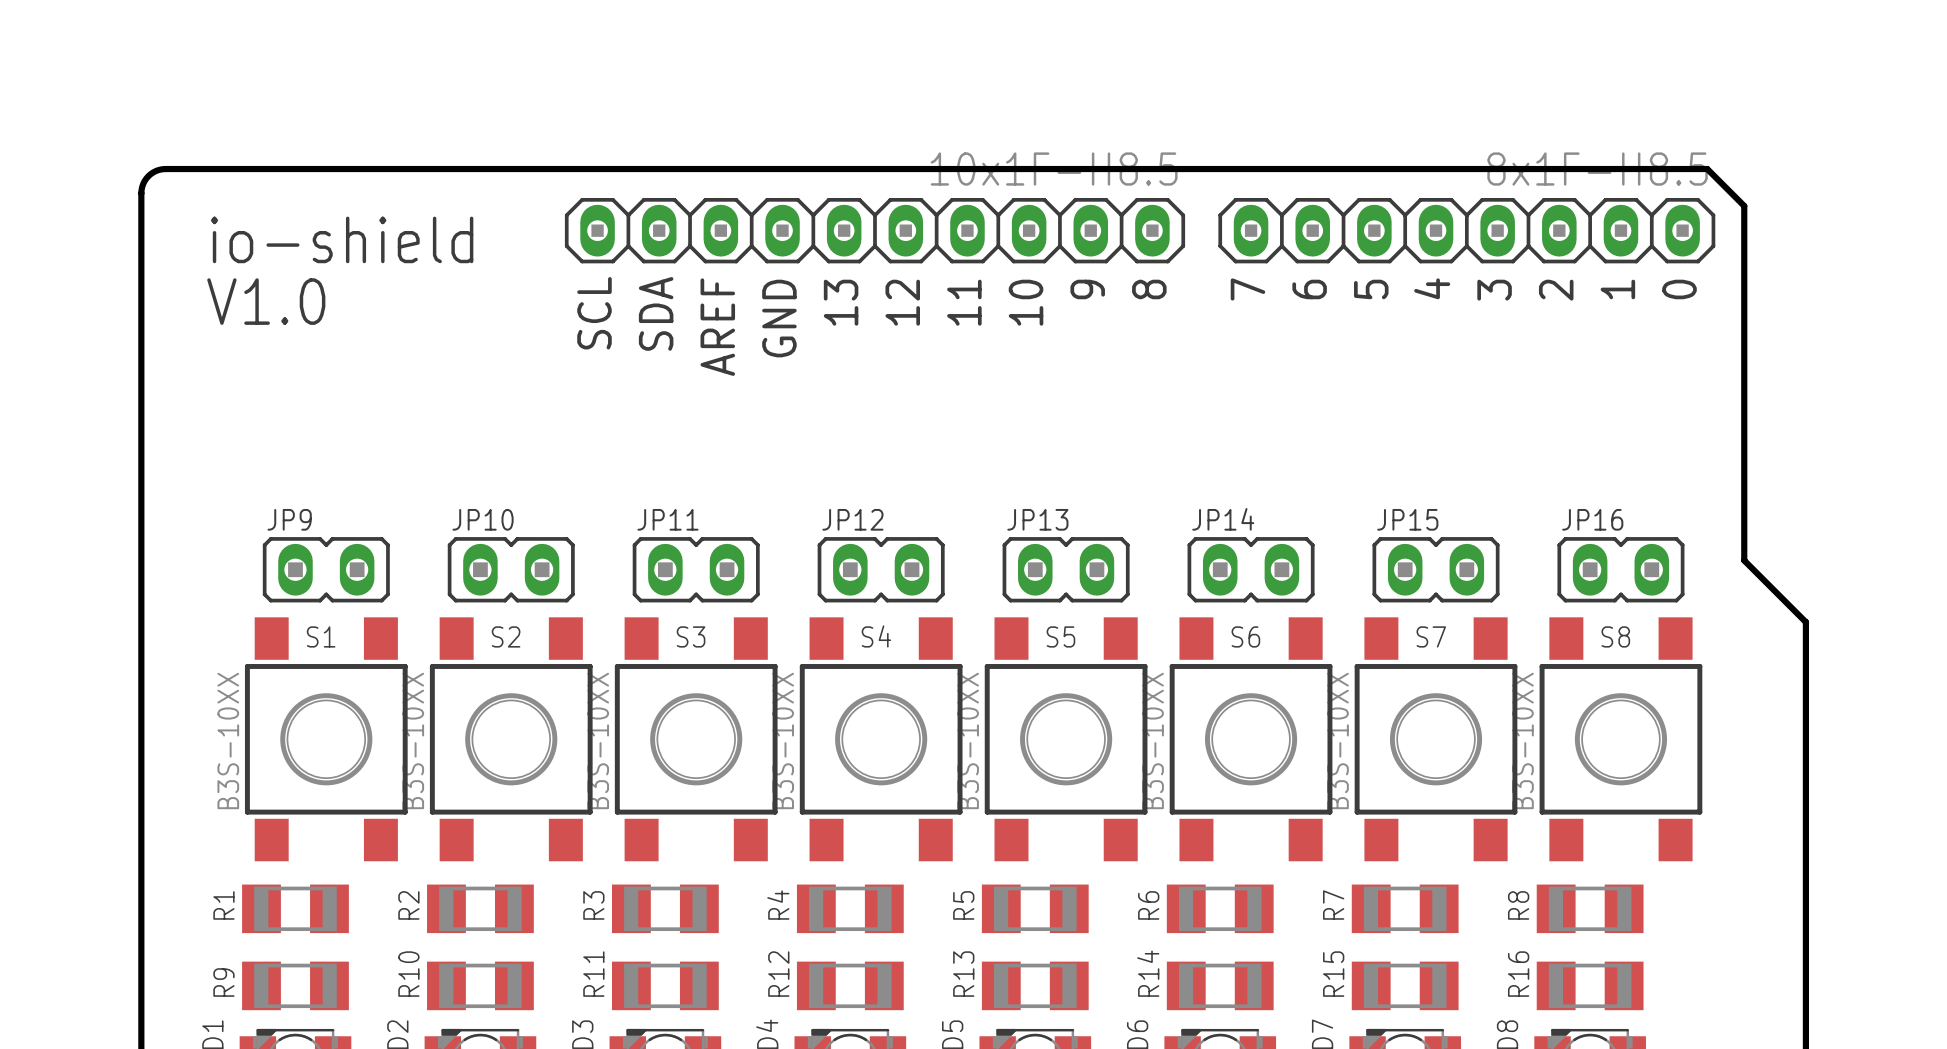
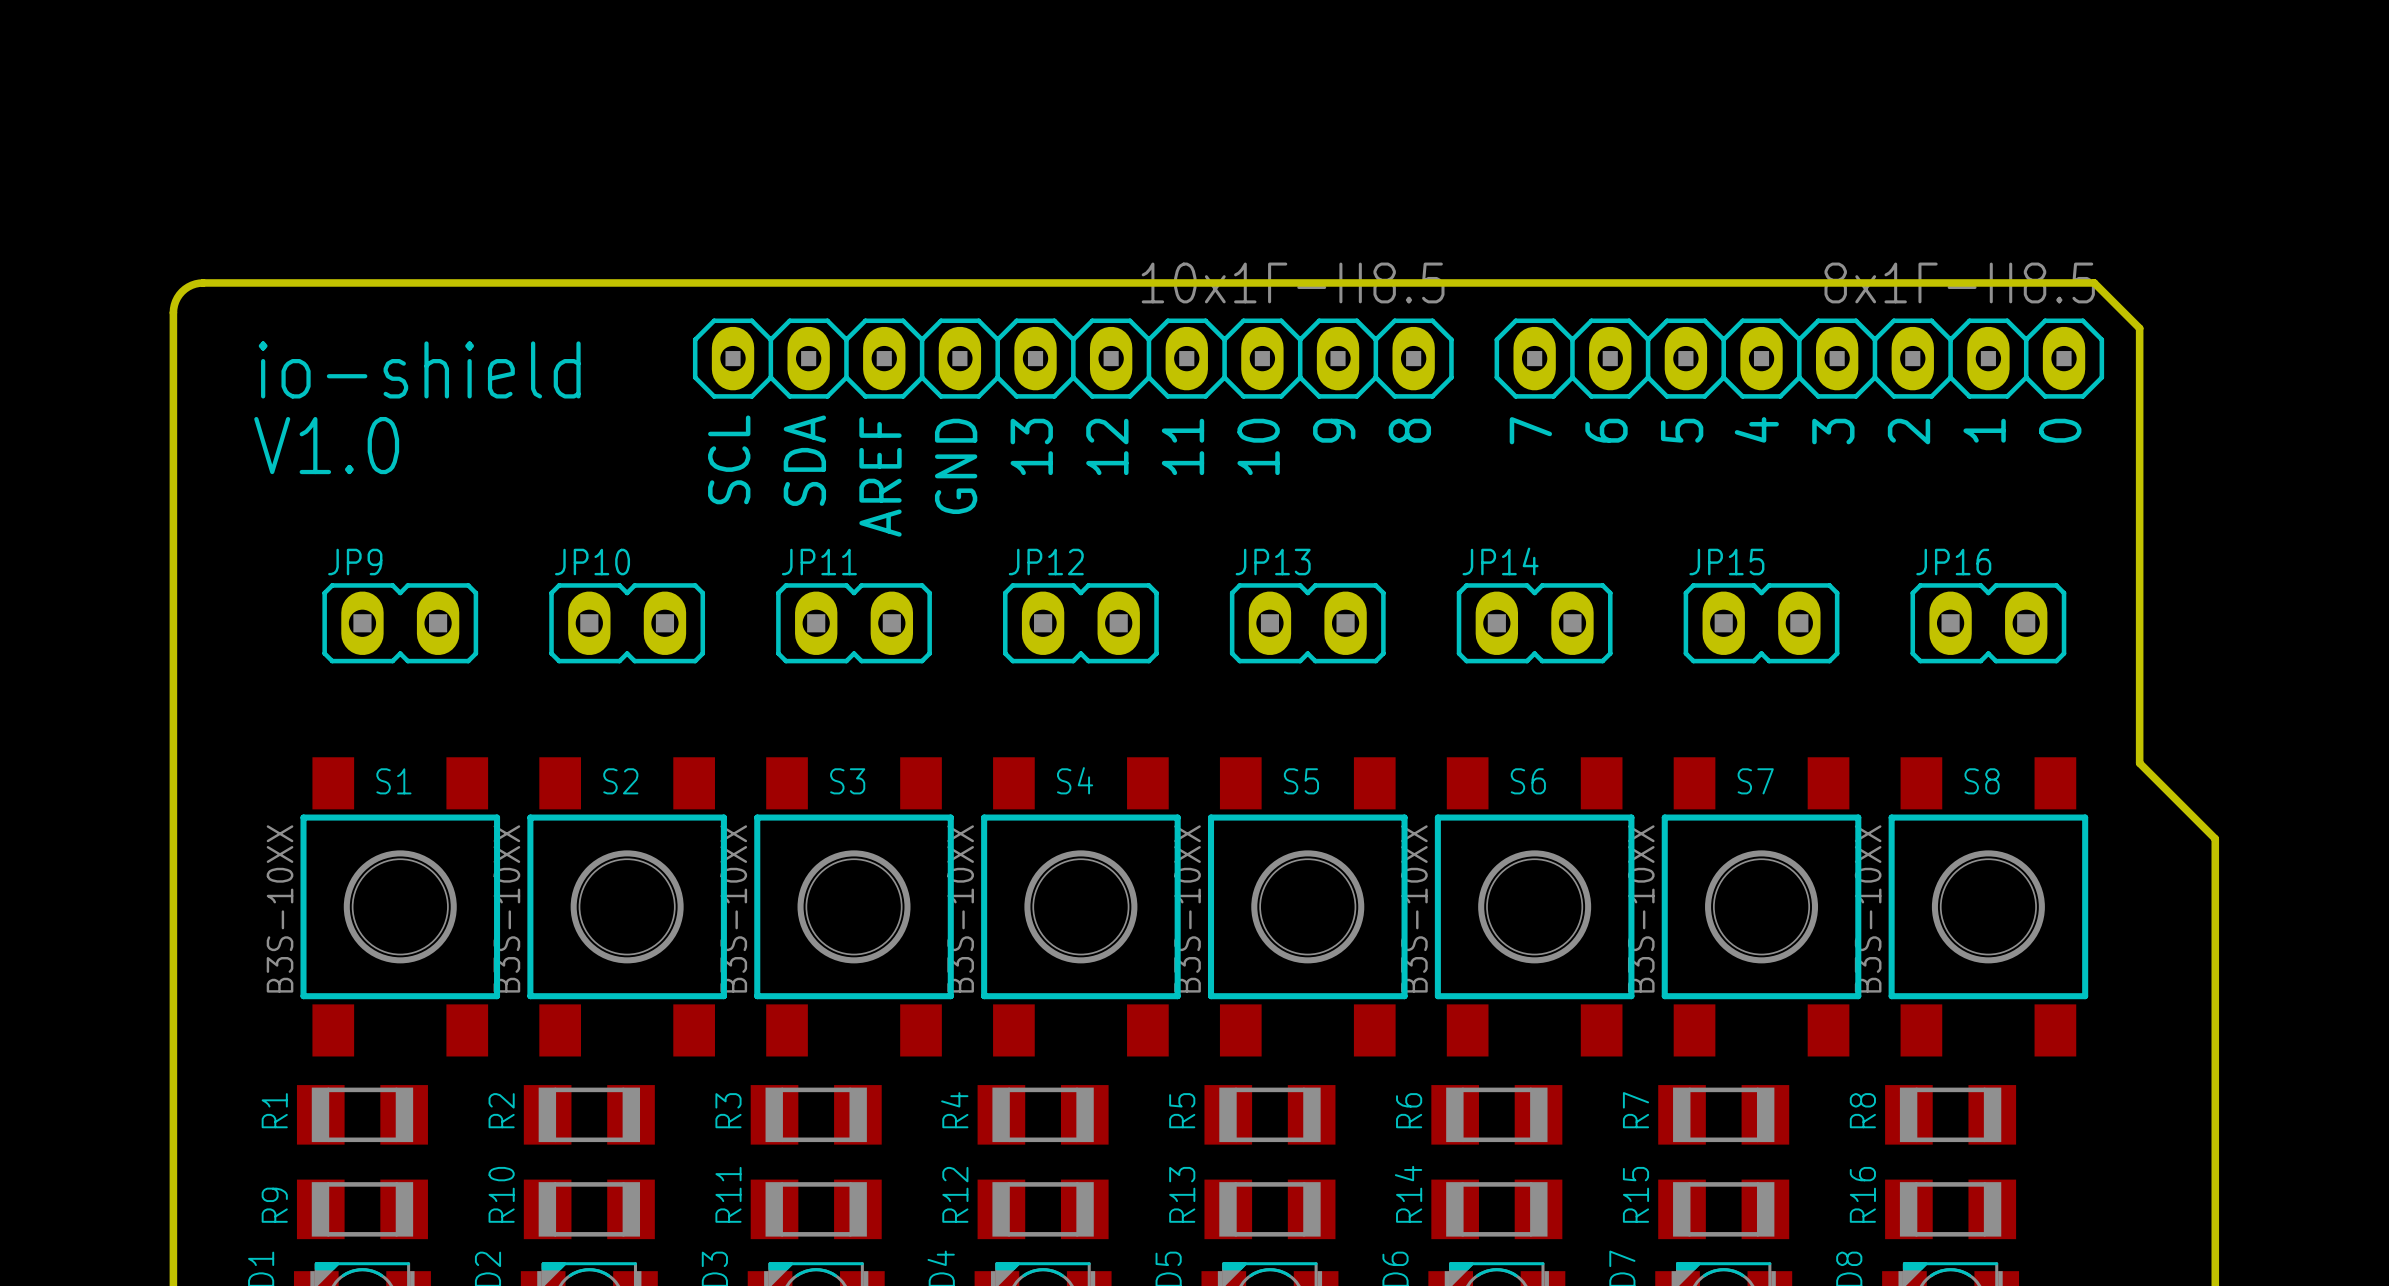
part position: (874, 230) -> (1073, 358)
part position: (1466, 230) -> (1799, 358)
text: io-shield (342, 239) -> none
board edge: (141, 254) (142, 187) (150, 174) (165, 169) (1707, 169) (1744, 206) (1744, 267) -> (173, 312) (175, 301) (182, 291) (191, 285) (203, 282) (2094, 282) (2139, 328)
text position: 4 (1432, 288) -> 4 (1756, 429)
text position: 9 (1087, 289) -> 9 (1334, 430)
text position: 8 (1149, 289) -> 8 (1409, 430)
text position: 7 (1247, 289) -> 7 (1530, 430)
text position: 6 (1309, 289) -> 6 (1606, 430)
text position: 5 (1371, 289) -> 5 (1682, 430)
text position: 1 (1617, 289) -> 1 (1984, 430)
text position: 0 (1679, 289) -> 0 (2060, 430)
text position: 3 (1494, 290) -> 3 (1833, 431)
text position: 2 (1556, 290) -> 2 (1908, 431)
text: V1.0 (266, 301) -> io-shield (419, 369)
text position: 13 (841, 302) -> 13 (1031, 446)
text position: 12 (902, 302) -> 12 (1107, 446)
text position: 11 (964, 302) -> 11 (1182, 446)
text position: 10 (1026, 302) -> 10 (1258, 446)
text position: SCL (594, 313) -> SCL (729, 459)
text position: SDA (656, 313) -> SDA (804, 460)
text position: GND (779, 318) -> GND (956, 466)
text position: AREF (717, 327) -> AREF (880, 476)
text: none -> V1.0 (326, 445)
board edge: (1744, 560) (1805, 622) (1805, 683) -> (2139, 687) (2139, 763) (2215, 838)
JP9 position: (326, 569) -> (400, 623)
JP10 position: (511, 569) -> (627, 623)
JP11 position: (696, 569) -> (854, 623)
JP12 position: (881, 569) -> (1080, 623)
JP13 position: (1066, 569) -> (1307, 623)
JP14 position: (1251, 569) -> (1534, 623)
JP15 position: (1436, 569) -> (1761, 623)
JP16 position: (1620, 569) -> (1988, 623)

